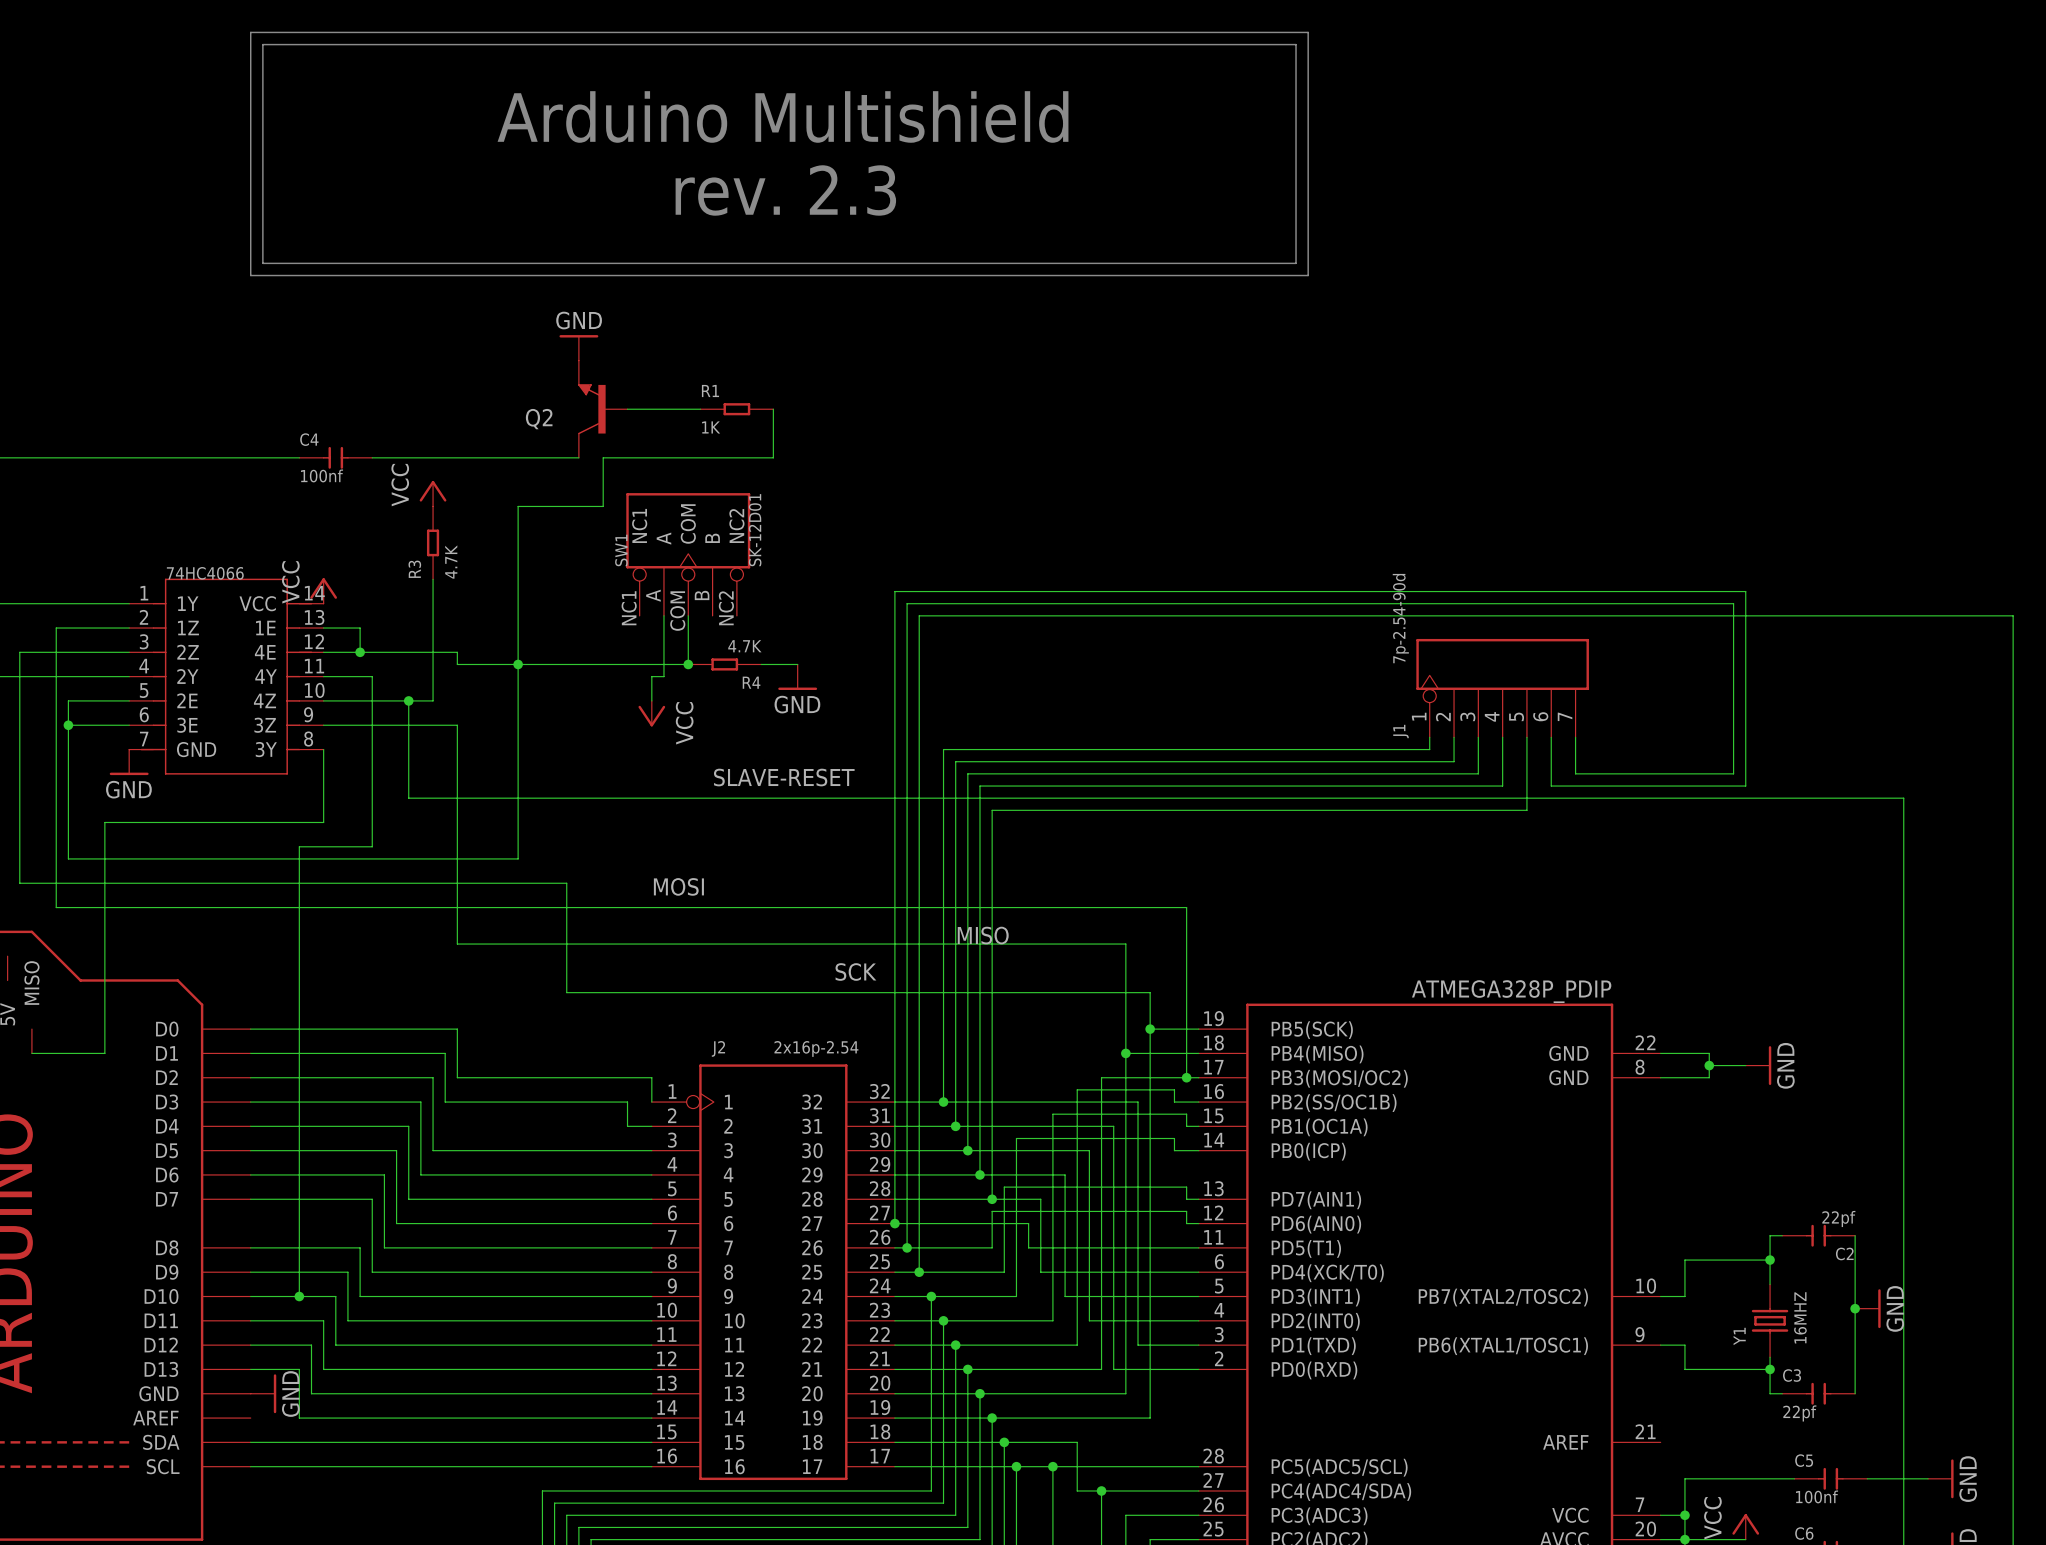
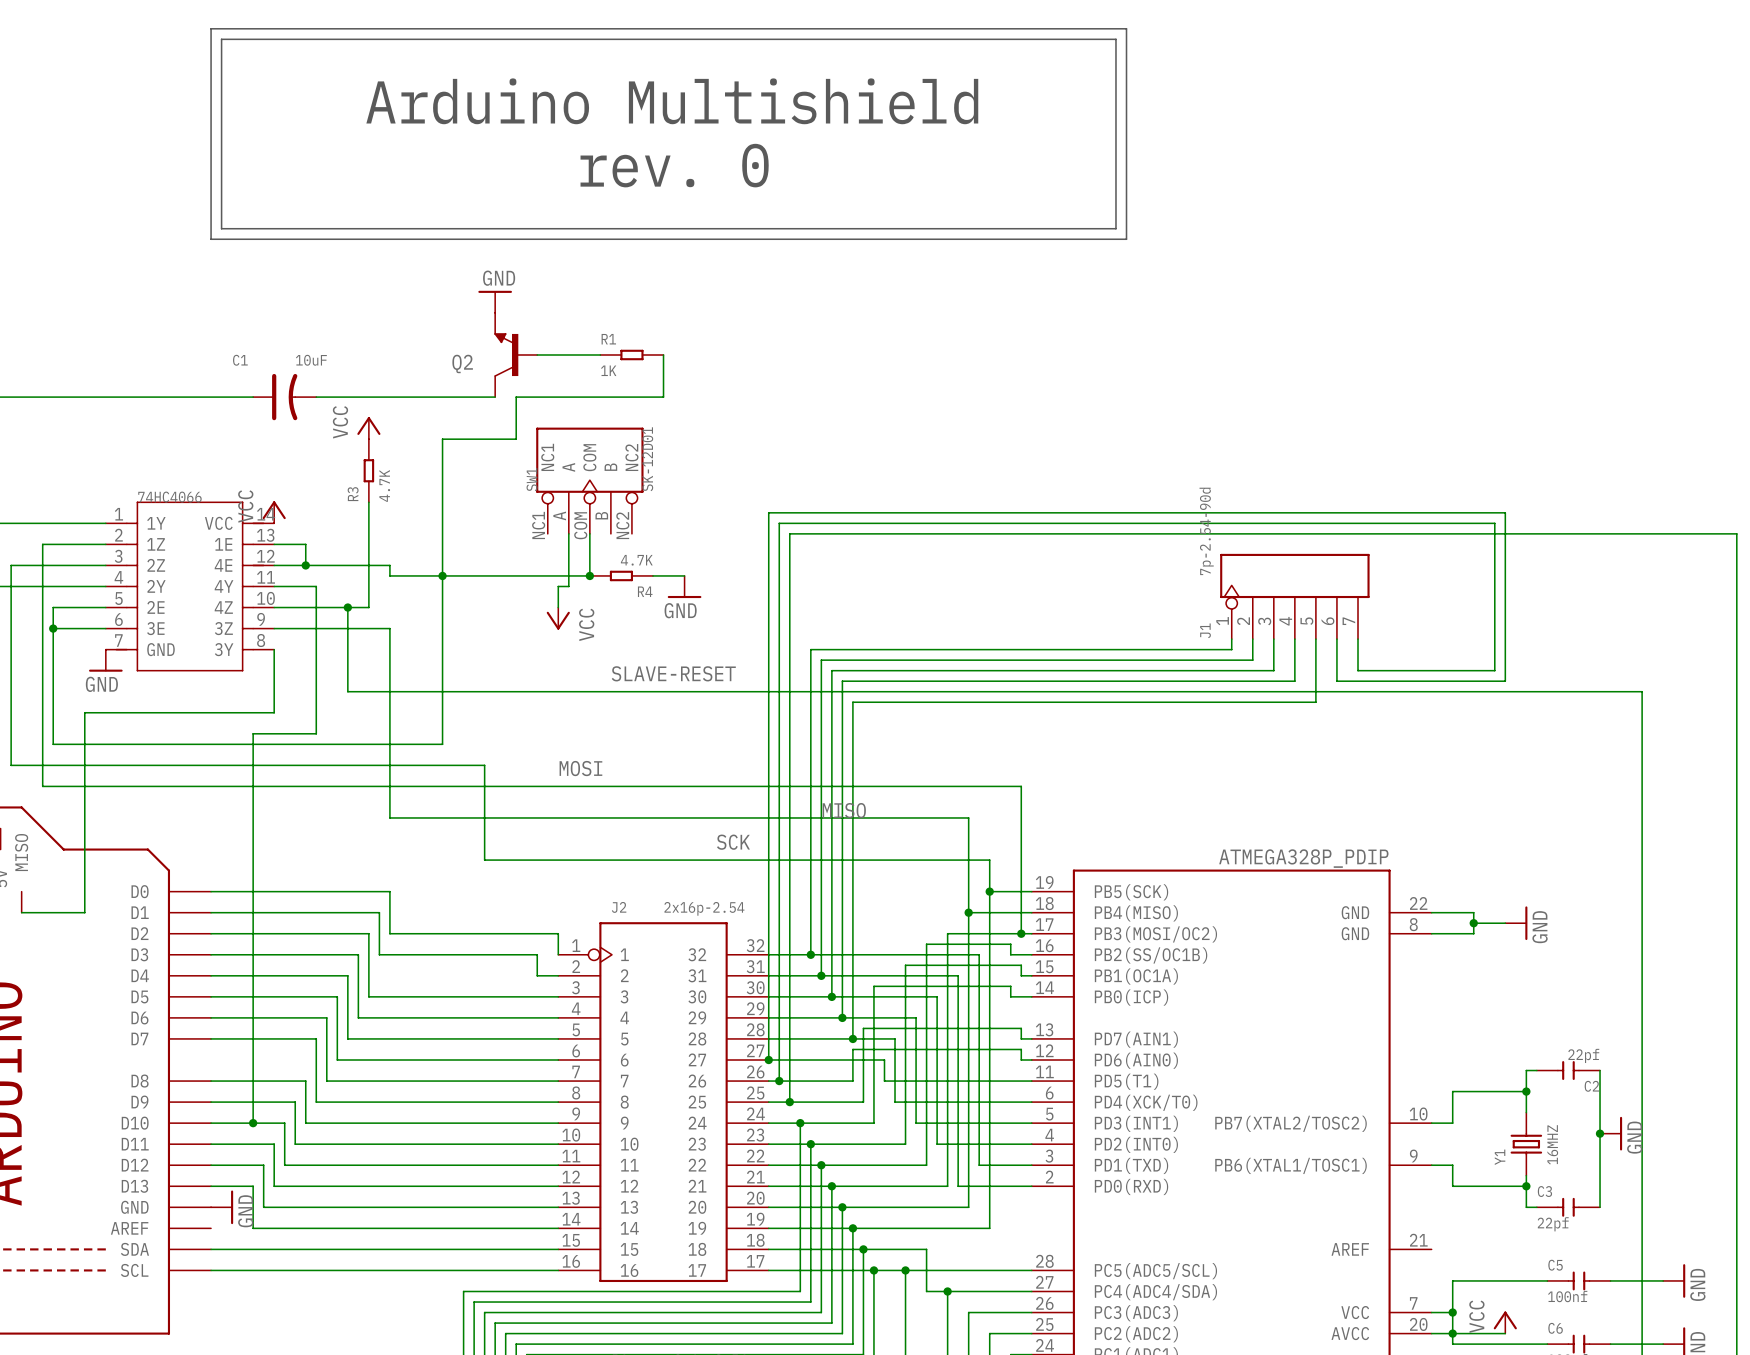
text: rev. 2.3 (785, 190) -> rev. 0 (674, 165)
C4: 100nf (335, 457) -> none
C1: none -> 10uF (284, 397)

